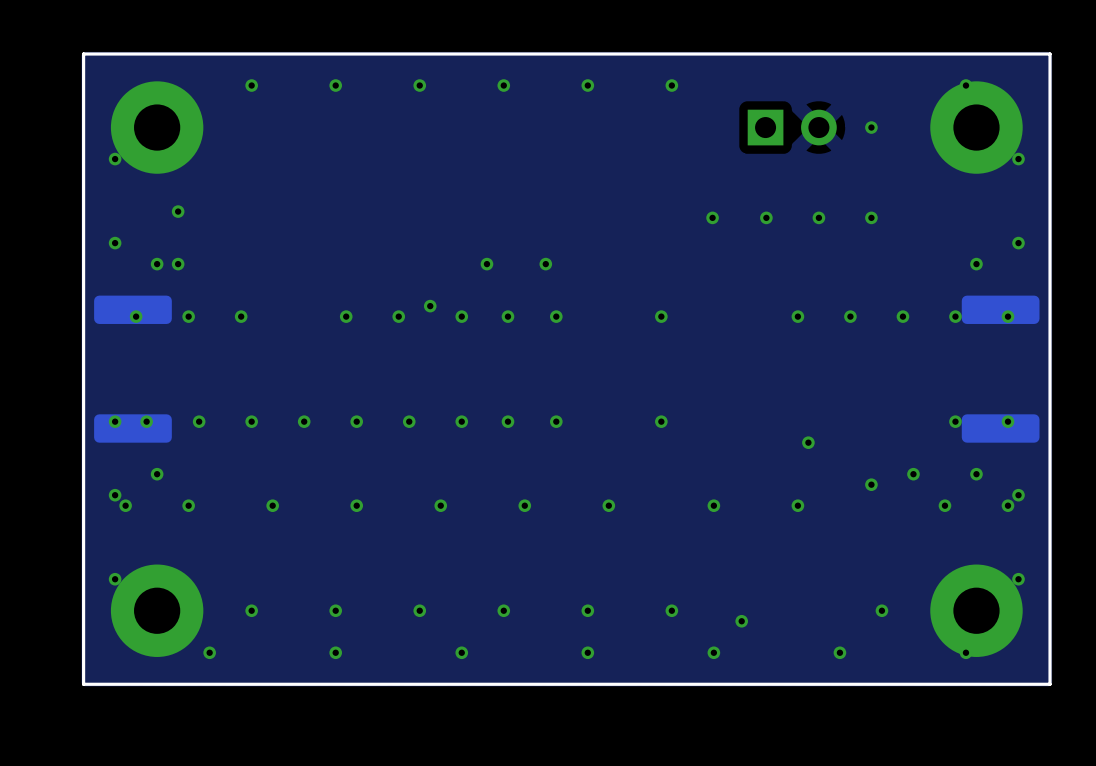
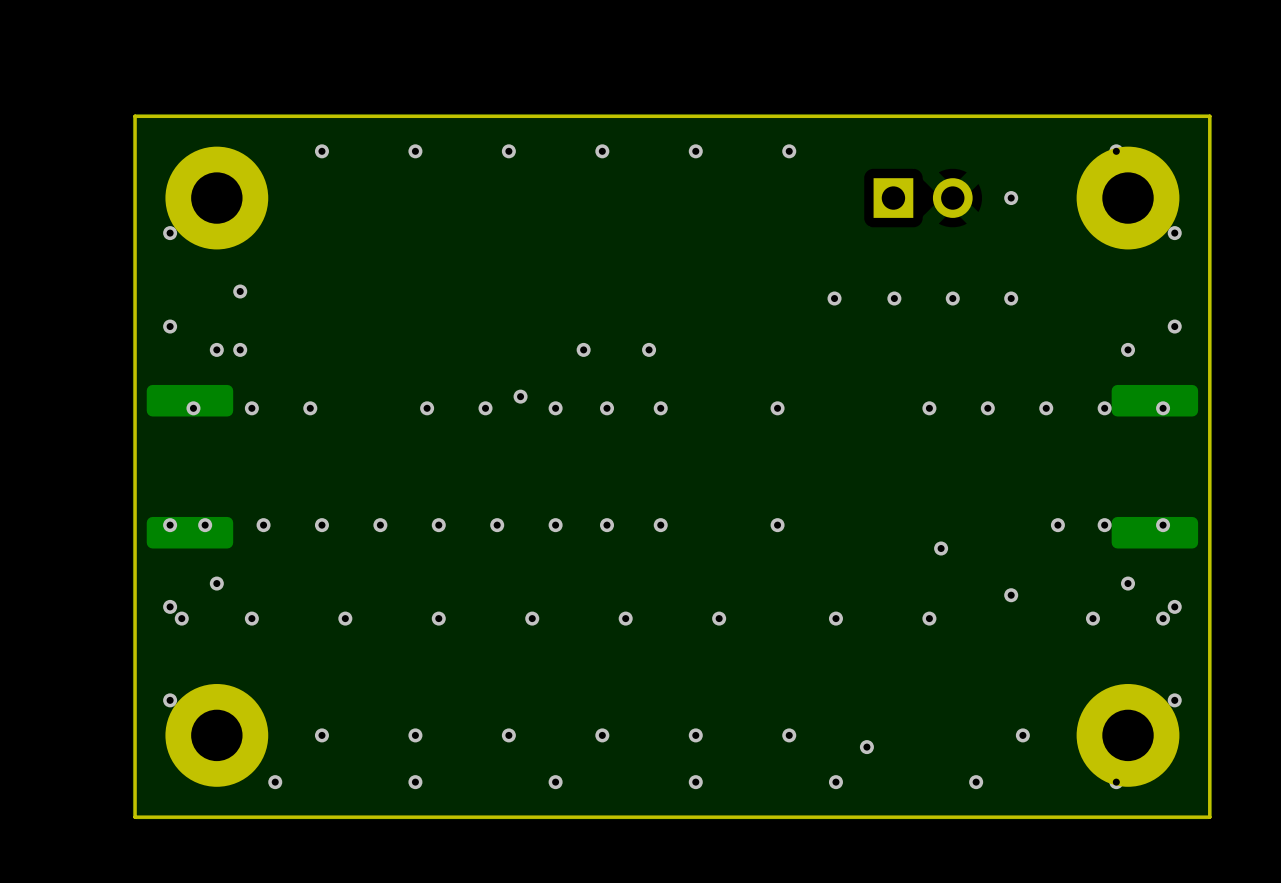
via position: (913, 474) -> (1057, 525)

